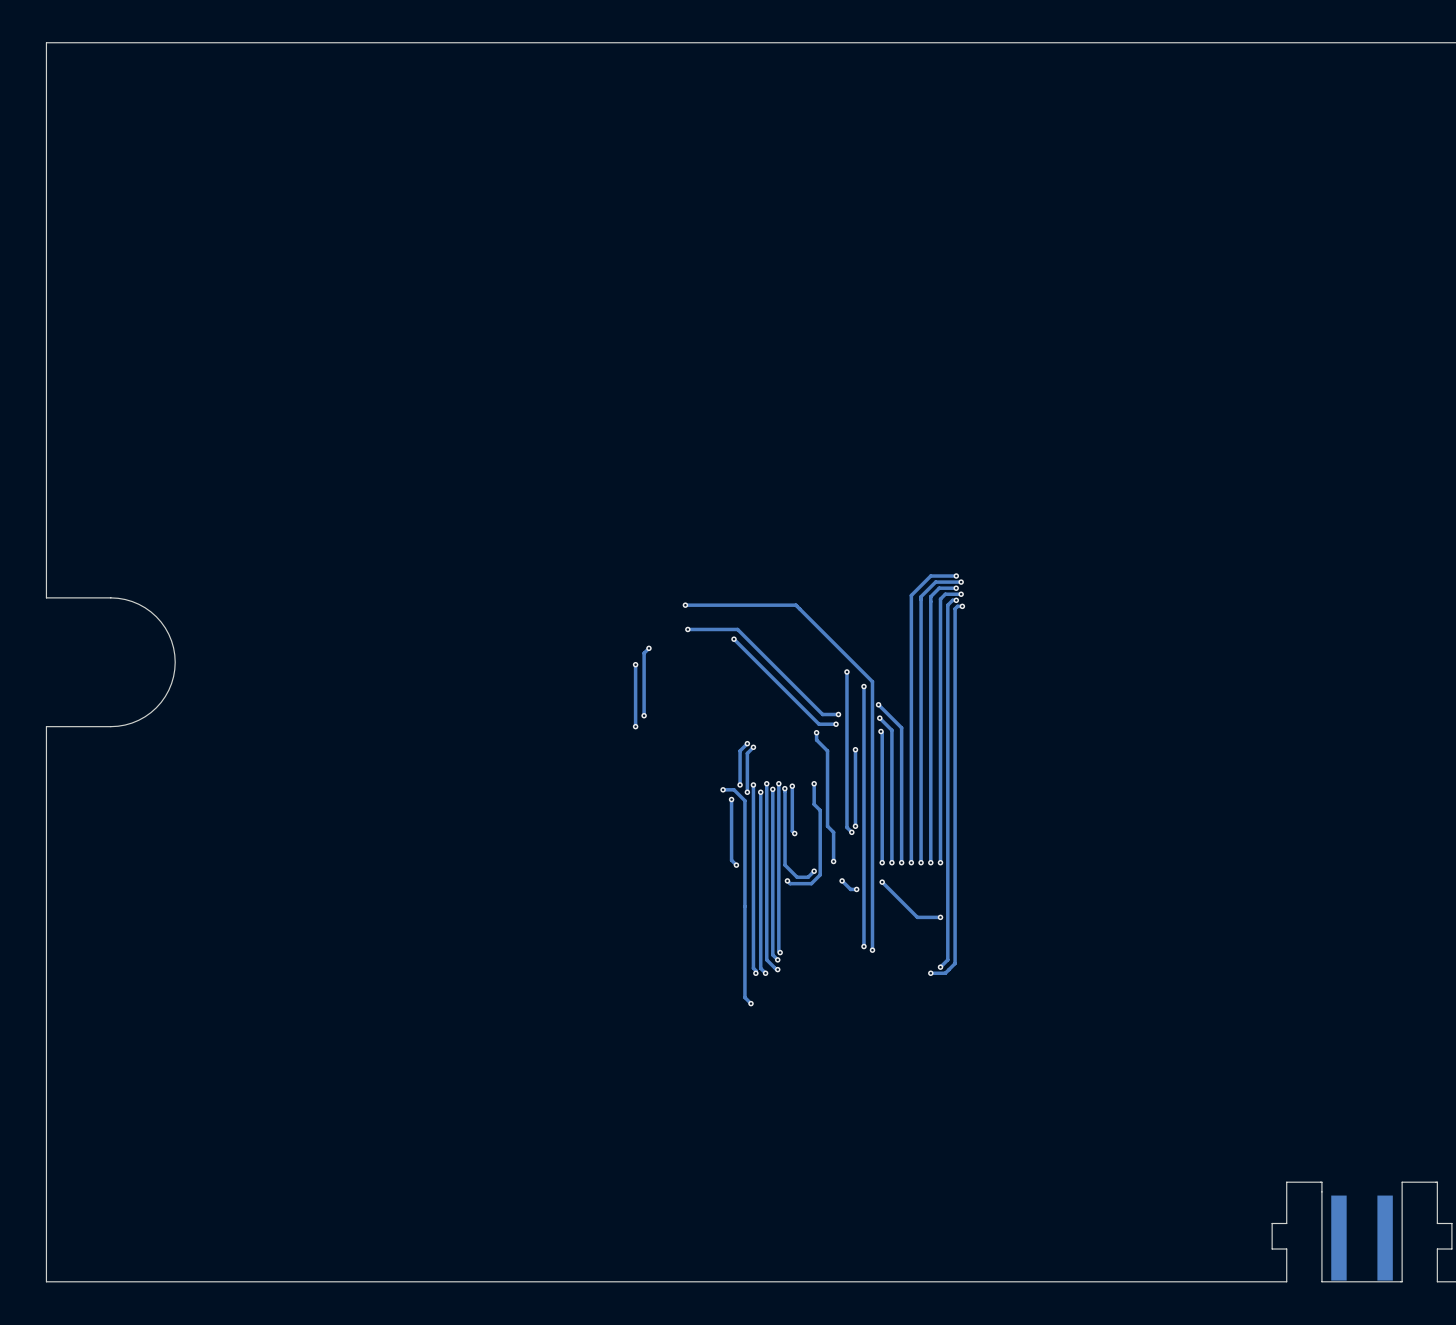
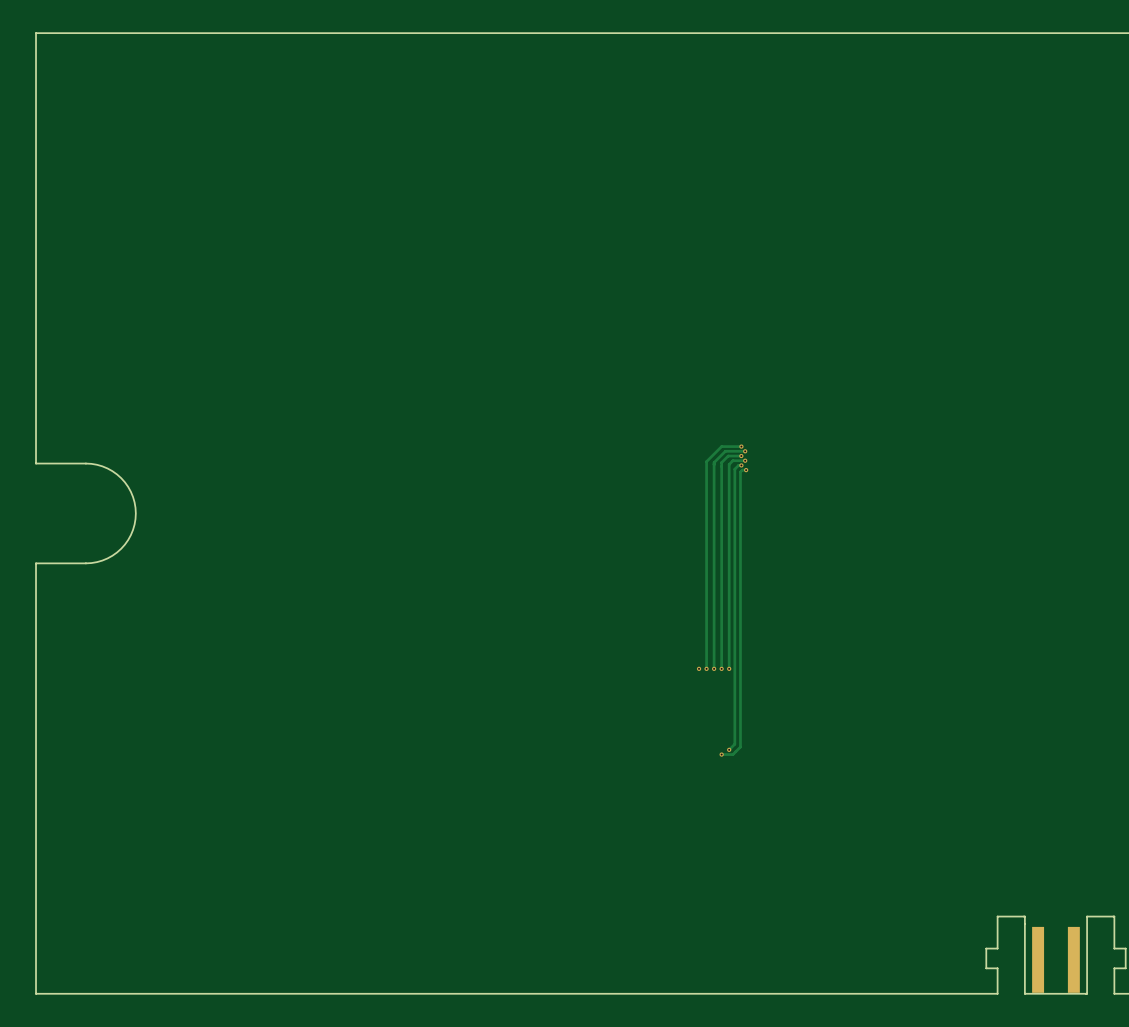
track: (685, 605) (795, 605) (872, 681) (872, 950) -> none
via: (685, 605) -> none
track: (687, 629) (737, 629) (822, 714) (838, 714) -> none
via: (687, 629) -> none
track: (734, 639) (819, 724) (836, 724) -> none
via: (734, 639) -> none
track: (648, 648) (644, 653) (644, 715) -> none
via: (648, 648) -> none
track: (635, 664) (635, 726) -> none
via: (635, 664) -> none
track: (846, 671) (846, 827) (851, 832) -> none
via: (846, 671) -> none
track: (863, 686) (863, 946) -> none
via: (863, 686) -> none
track: (878, 704) (901, 727) (901, 862) -> none
via: (878, 704) -> none
via: (838, 714) -> none
via: (644, 715) -> none
track: (879, 718) (891, 730) (891, 862) -> none
via: (879, 718) -> none
via: (836, 724) -> none
via: (635, 726) -> none
track: (880, 731) (882, 862) -> none
via: (880, 731) -> none
track: (816, 732) (816, 740) (827, 750) (827, 826) (833, 832) (833, 861) -> none
via: (816, 732) -> none
track: (747, 743) (740, 750) (740, 784) -> none
via: (747, 743) -> none
track: (753, 747) (747, 753) (747, 792) -> none
via: (753, 747) -> none
track: (855, 749) (855, 826) -> none
via: (855, 749) -> none
track: (766, 783) (766, 959) (777, 969) -> none
via: (766, 783) -> none
track: (778, 783) (780, 952) -> none
via: (778, 783) -> none
track: (814, 783) (814, 804) (820, 810) (820, 874) (811, 883) (790, 883) (787, 880) -> none
via: (814, 783) -> none
via: (740, 784) -> none
track: (753, 784) (753, 968) (755, 973) -> none
via: (753, 784) -> none
track: (792, 786) (792, 831) (794, 833) -> none
via: (792, 786) -> none
via: (784, 788) -> none
track: (723, 789) (734, 789) (744, 800) (744, 997) (751, 1003) -> none
via: (723, 789) -> none
track: (772, 789) (772, 954) (777, 959) -> none
via: (772, 789) -> none
track: (785, 791) (785, 865) (797, 877) (808, 877) (814, 871) -> none
via: (747, 792) -> none
track: (760, 792) (760, 968) (765, 973) -> none
via: (760, 792) -> none
track: (731, 799) (731, 860) (736, 865) -> none
via: (731, 799) -> none
via: (855, 826) -> none
via: (851, 832) -> none
via: (794, 833) -> none
via: (833, 861) -> none
via: (882, 862) -> none
via: (891, 862) -> none
via: (736, 865) -> none
via: (814, 871) -> none
via: (787, 880) -> none
track: (842, 880) (850, 889) (856, 889) -> none
via: (842, 880) -> none
track: (882, 882) (917, 917) (940, 917) -> none
via: (882, 882) -> none
via: (856, 889) -> none
via: (940, 917) -> none
via: (863, 946) -> none
via: (872, 950) -> none
via: (780, 952) -> none
via: (777, 959) -> none
via: (777, 969) -> none
via: (755, 973) -> none
via: (765, 973) -> none
via: (751, 1003) -> none

